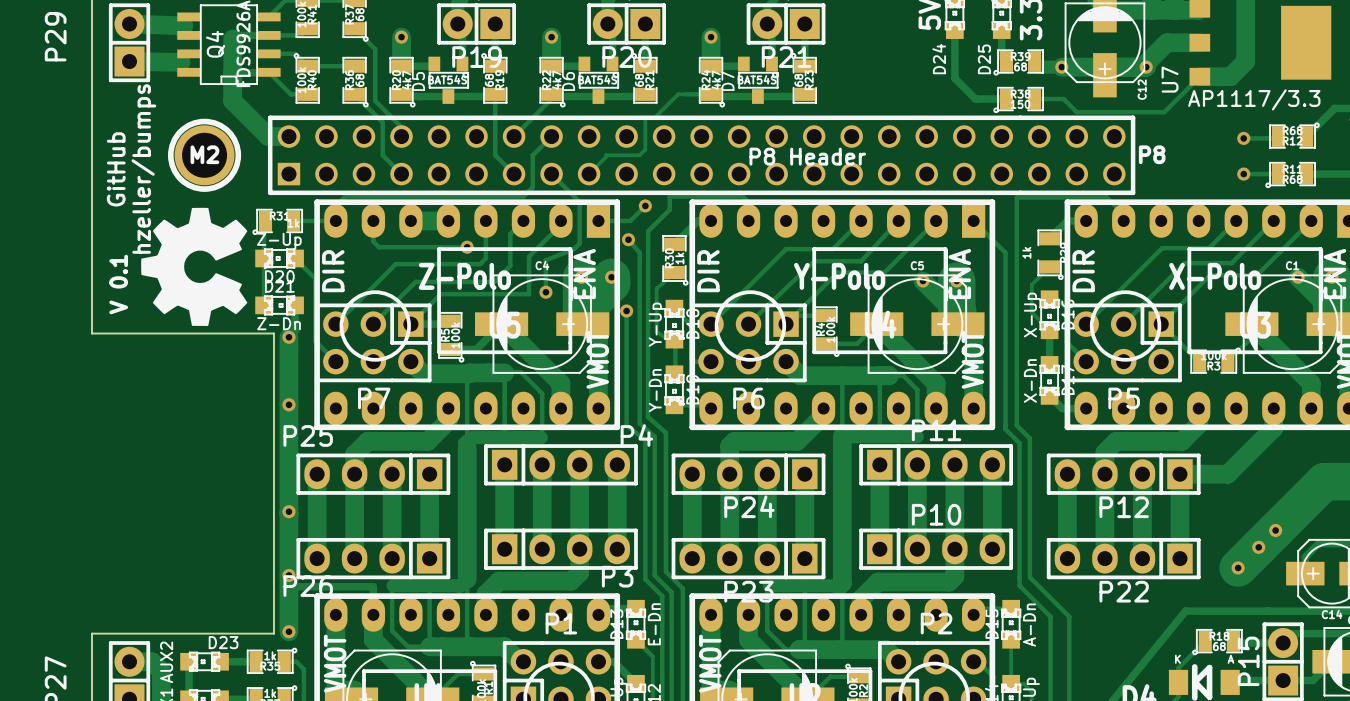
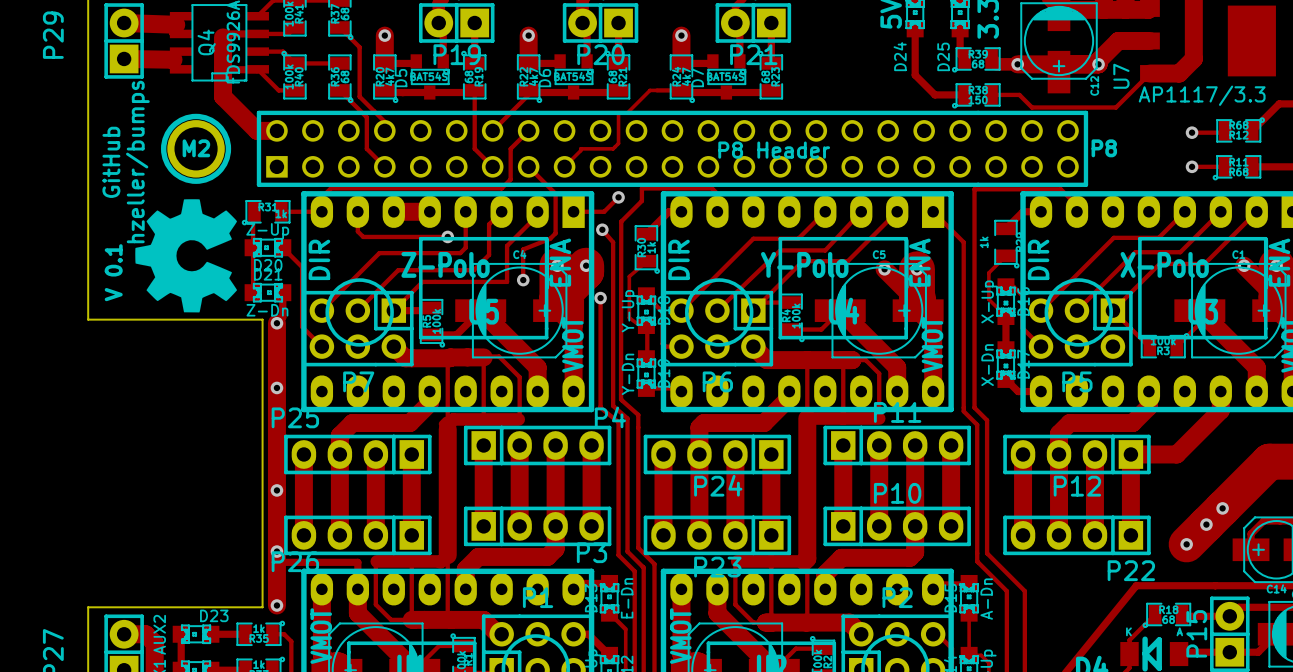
P22 name position: P22 (1124, 591) -> P22 (1131, 570)

